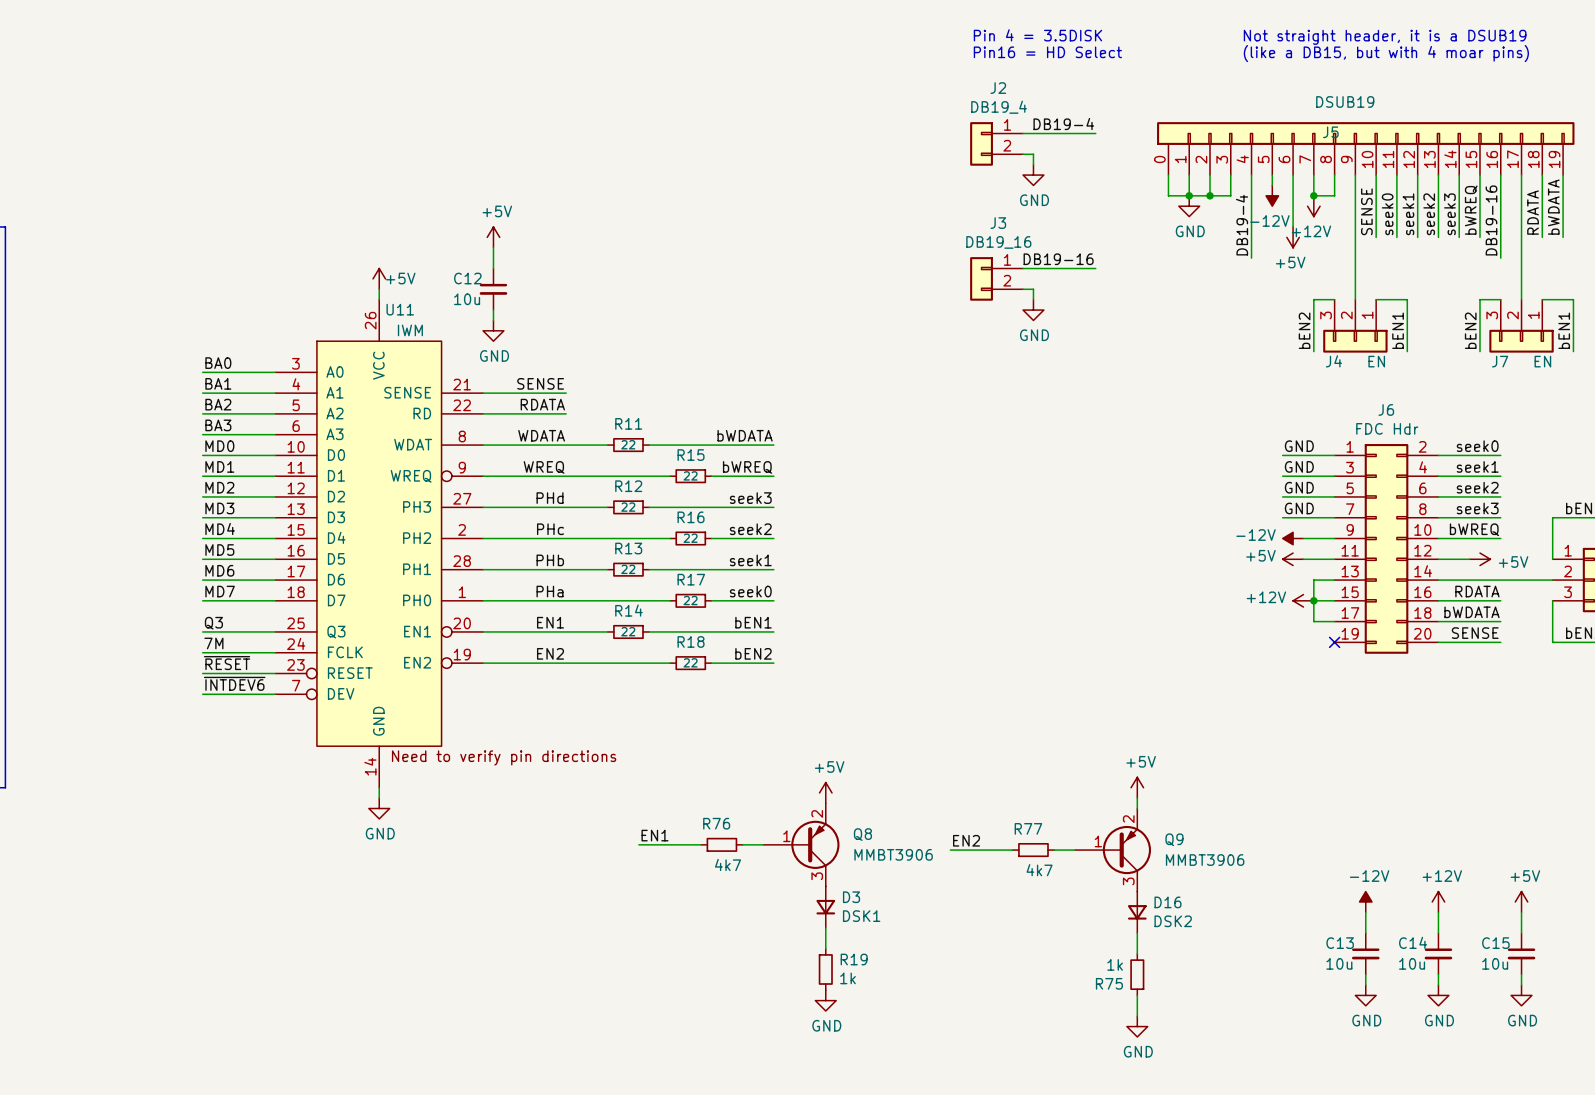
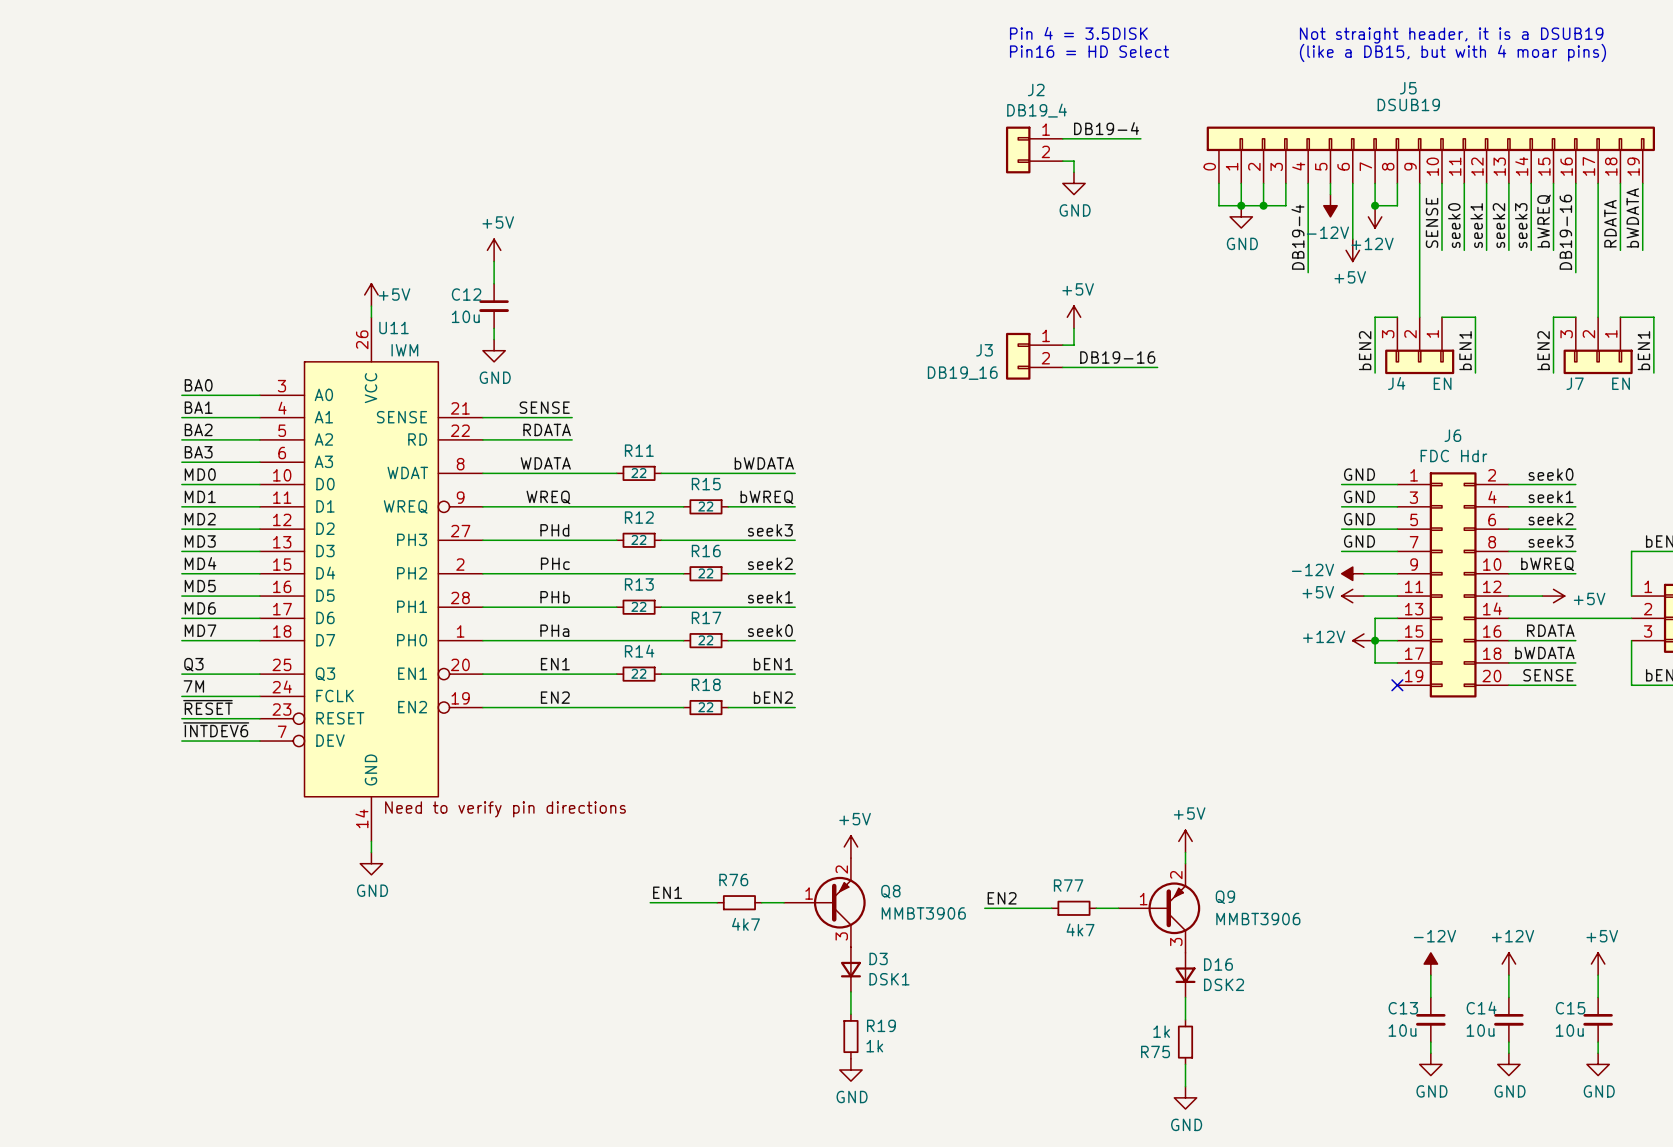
J5 name position: J5 (1330, 132) -> J5 (1408, 88)
J3 name position: J3 (998, 223) -> J3 (984, 350)
J3 value position: DB19_16 (998, 242) -> DB19_16 (962, 373)
label position: DB19-16 (1058, 259) -> DB19-16 (1117, 357)
wire: (1023, 268) (1095, 268) -> none
J3 position: (996, 278) -> (1034, 356)
wire: (1023, 289) (1033, 289) (1033, 299) -> none
power symbol: none -> +5V (1073, 317)
wire: none -> (1073, 328) (1073, 345) (1062, 345)
power symbol: GND (1033, 310) -> none
wire: none -> (1062, 367) (1157, 367)

